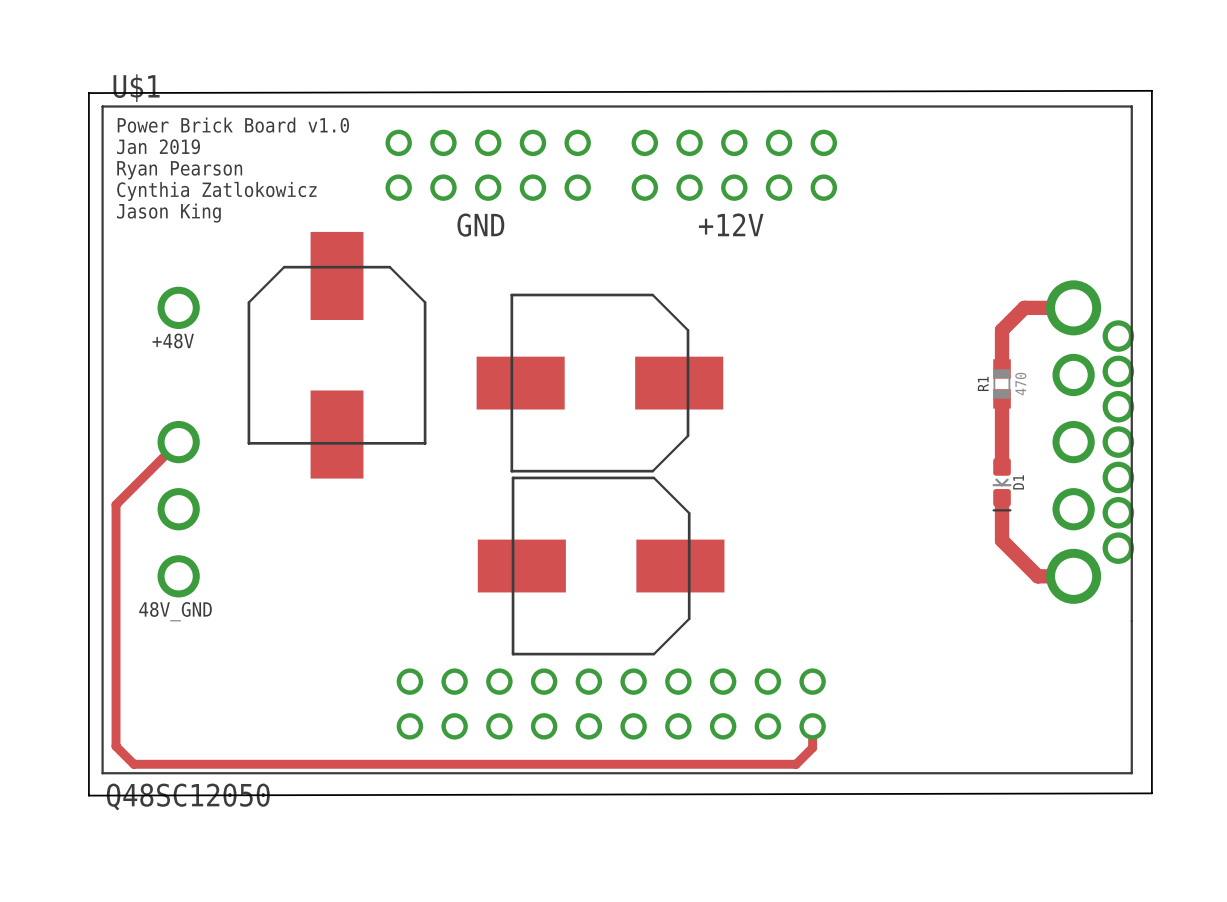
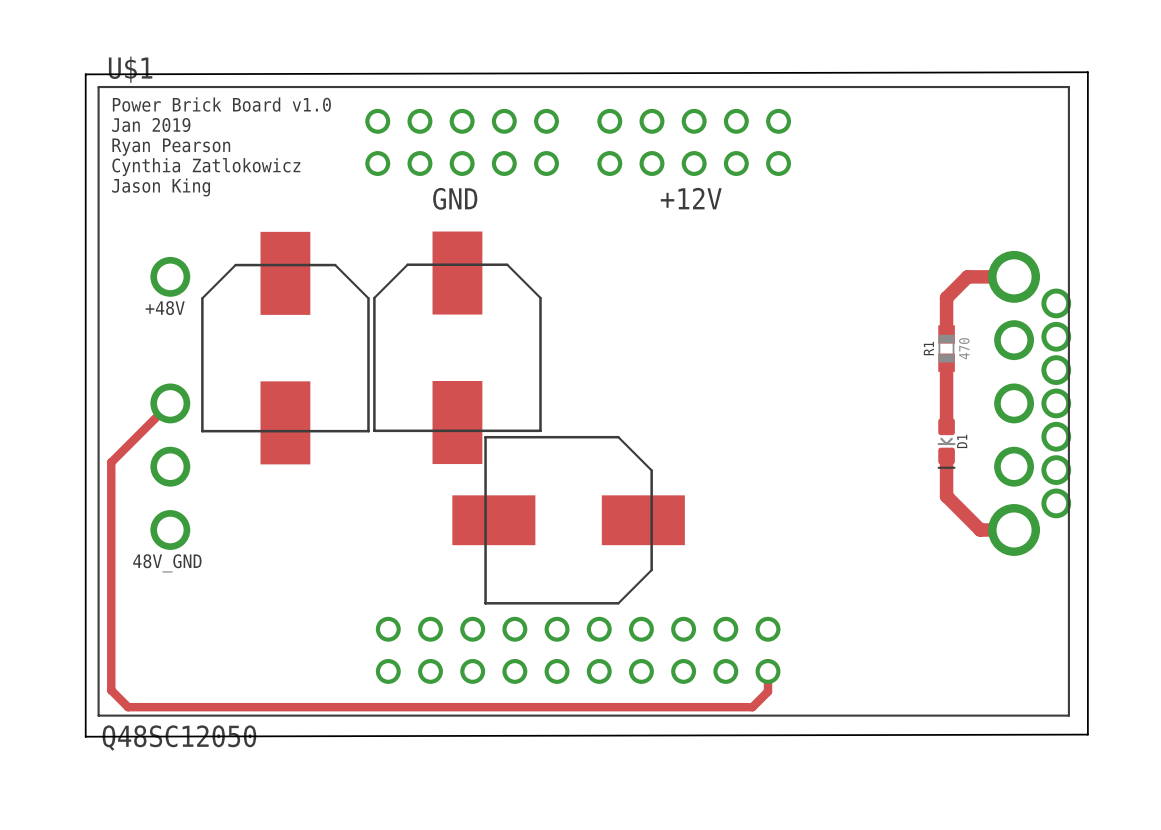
part position: (337, 355) -> (285, 348)
part: none -> (457, 347)
part: (599, 383) -> none

